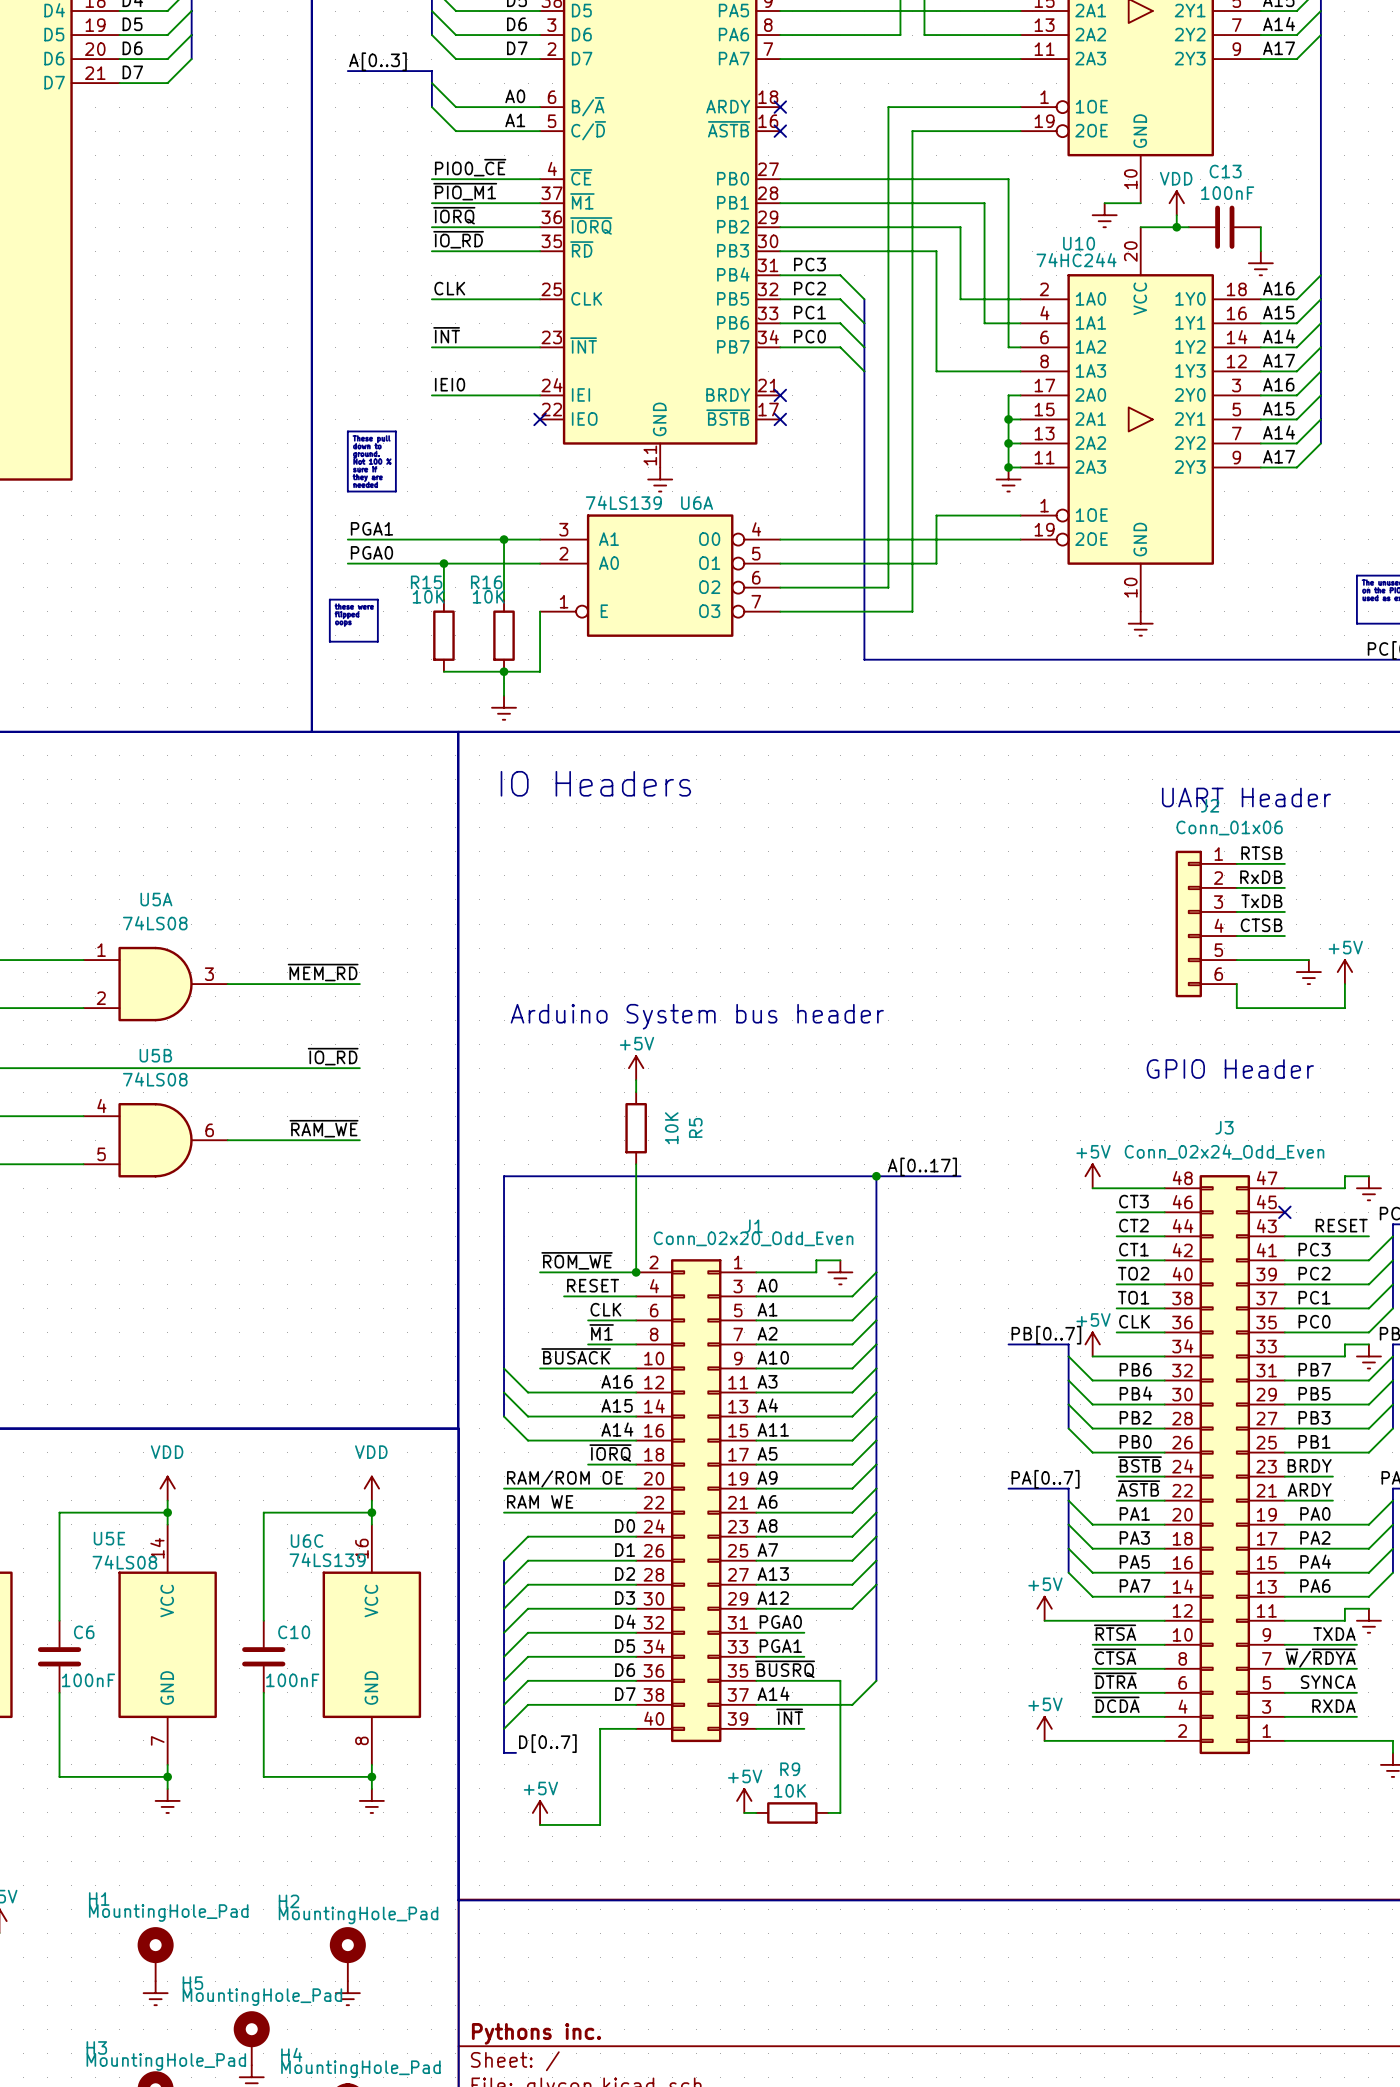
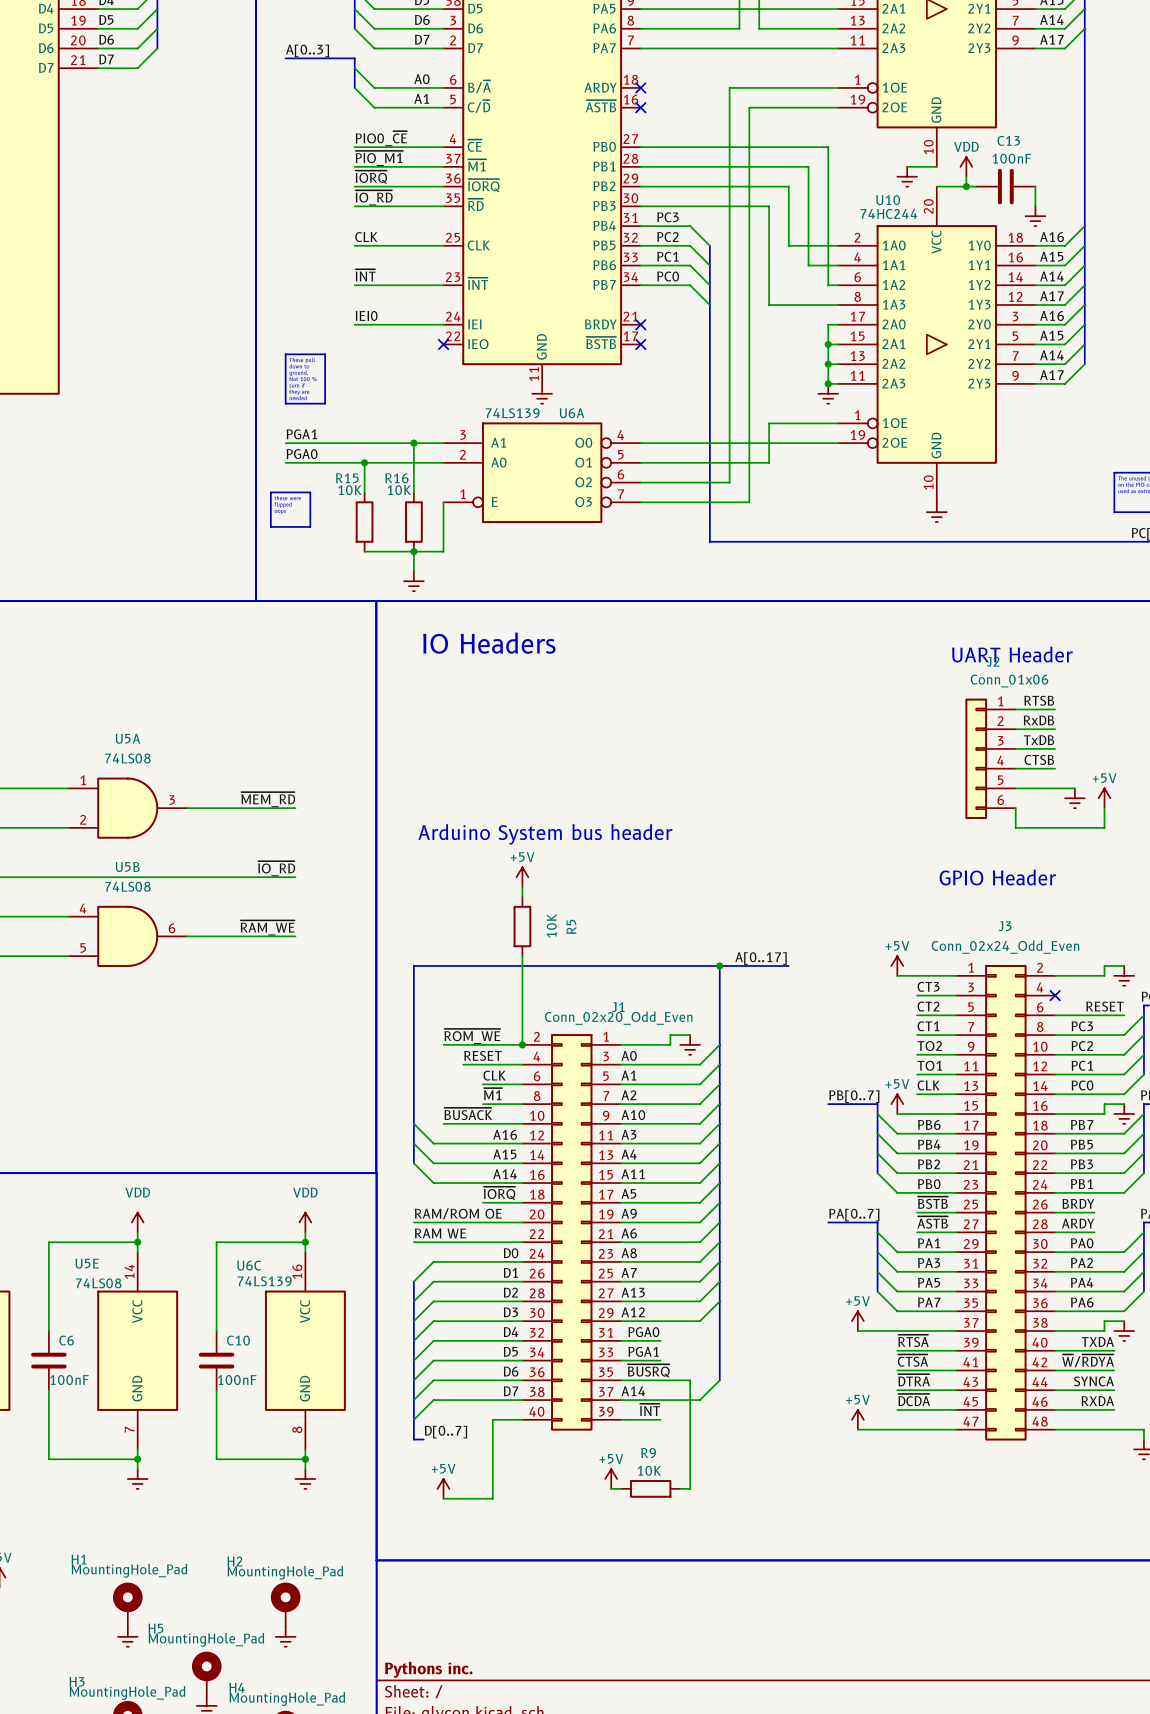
J3 rotation: 0° (1224, 1464) -> 180° (1005, 1202)

